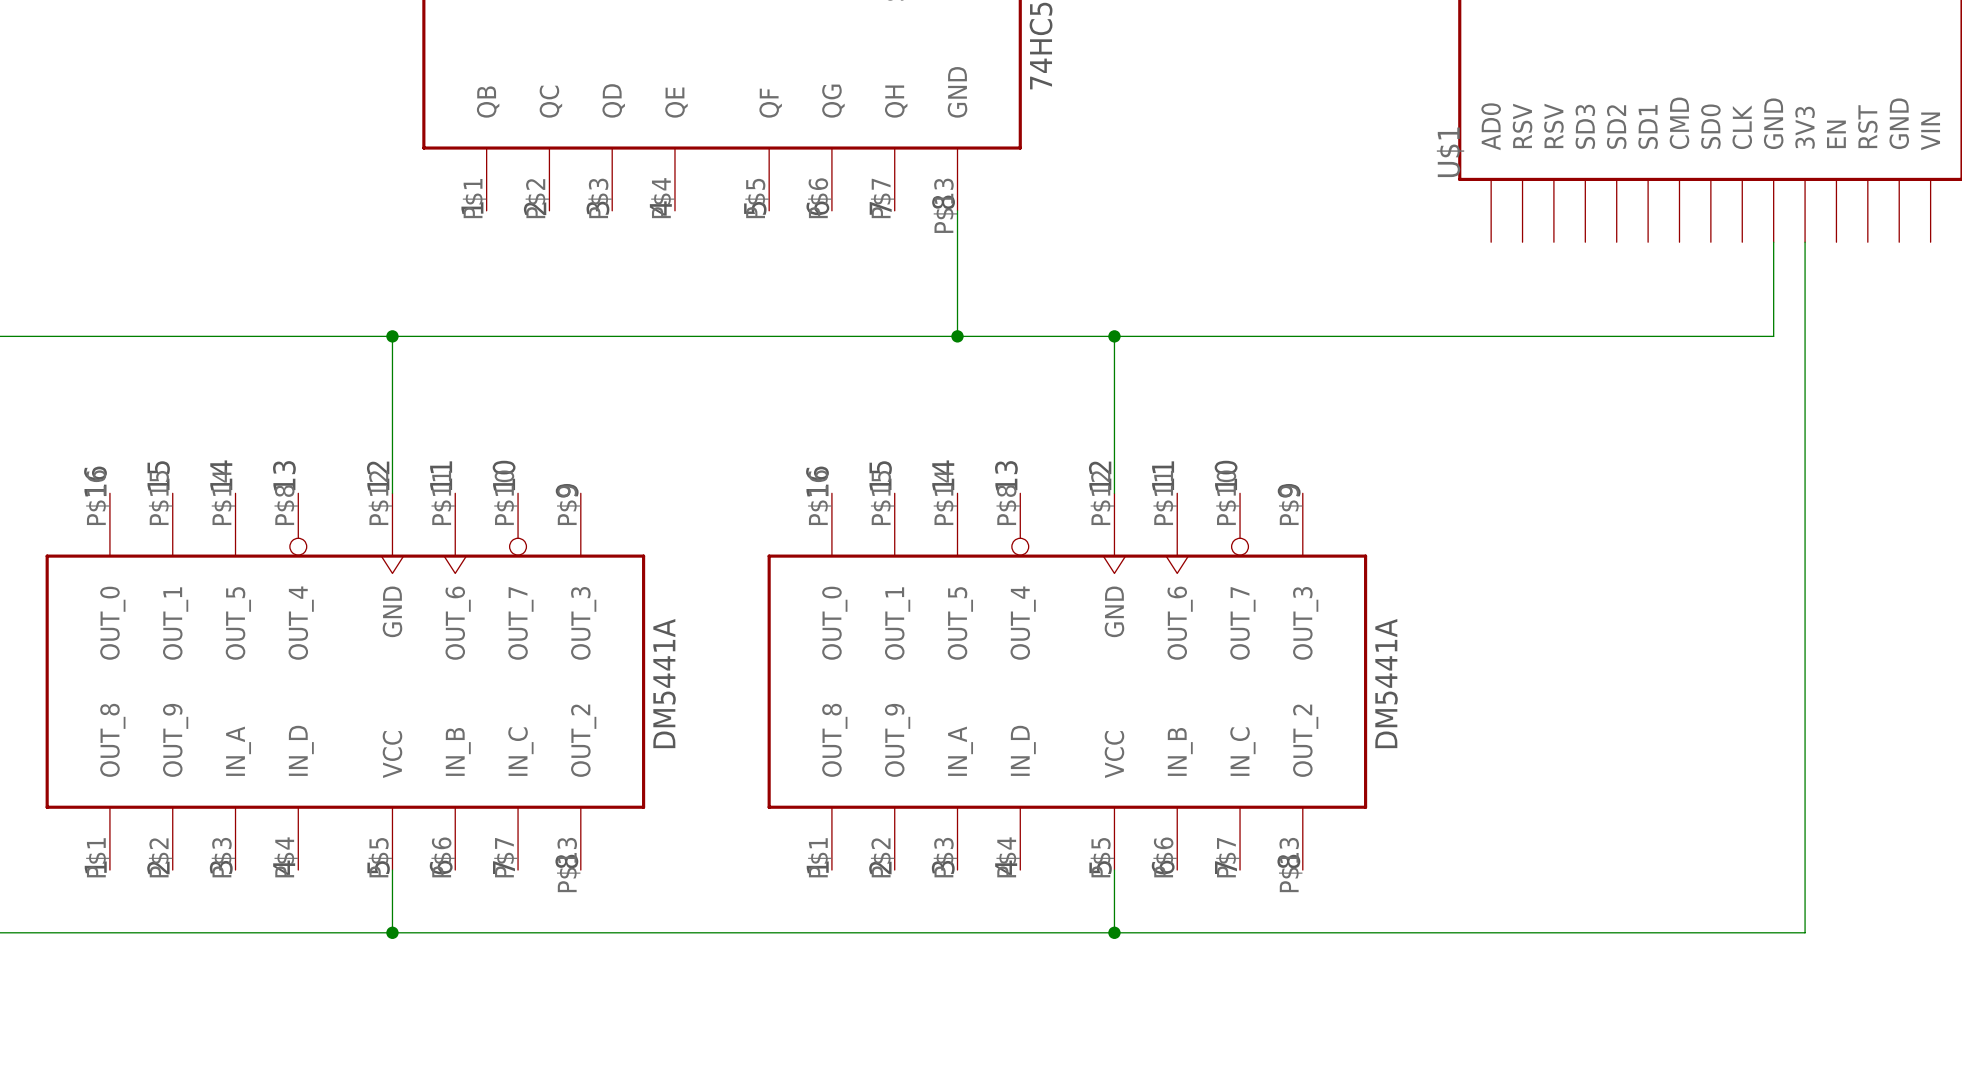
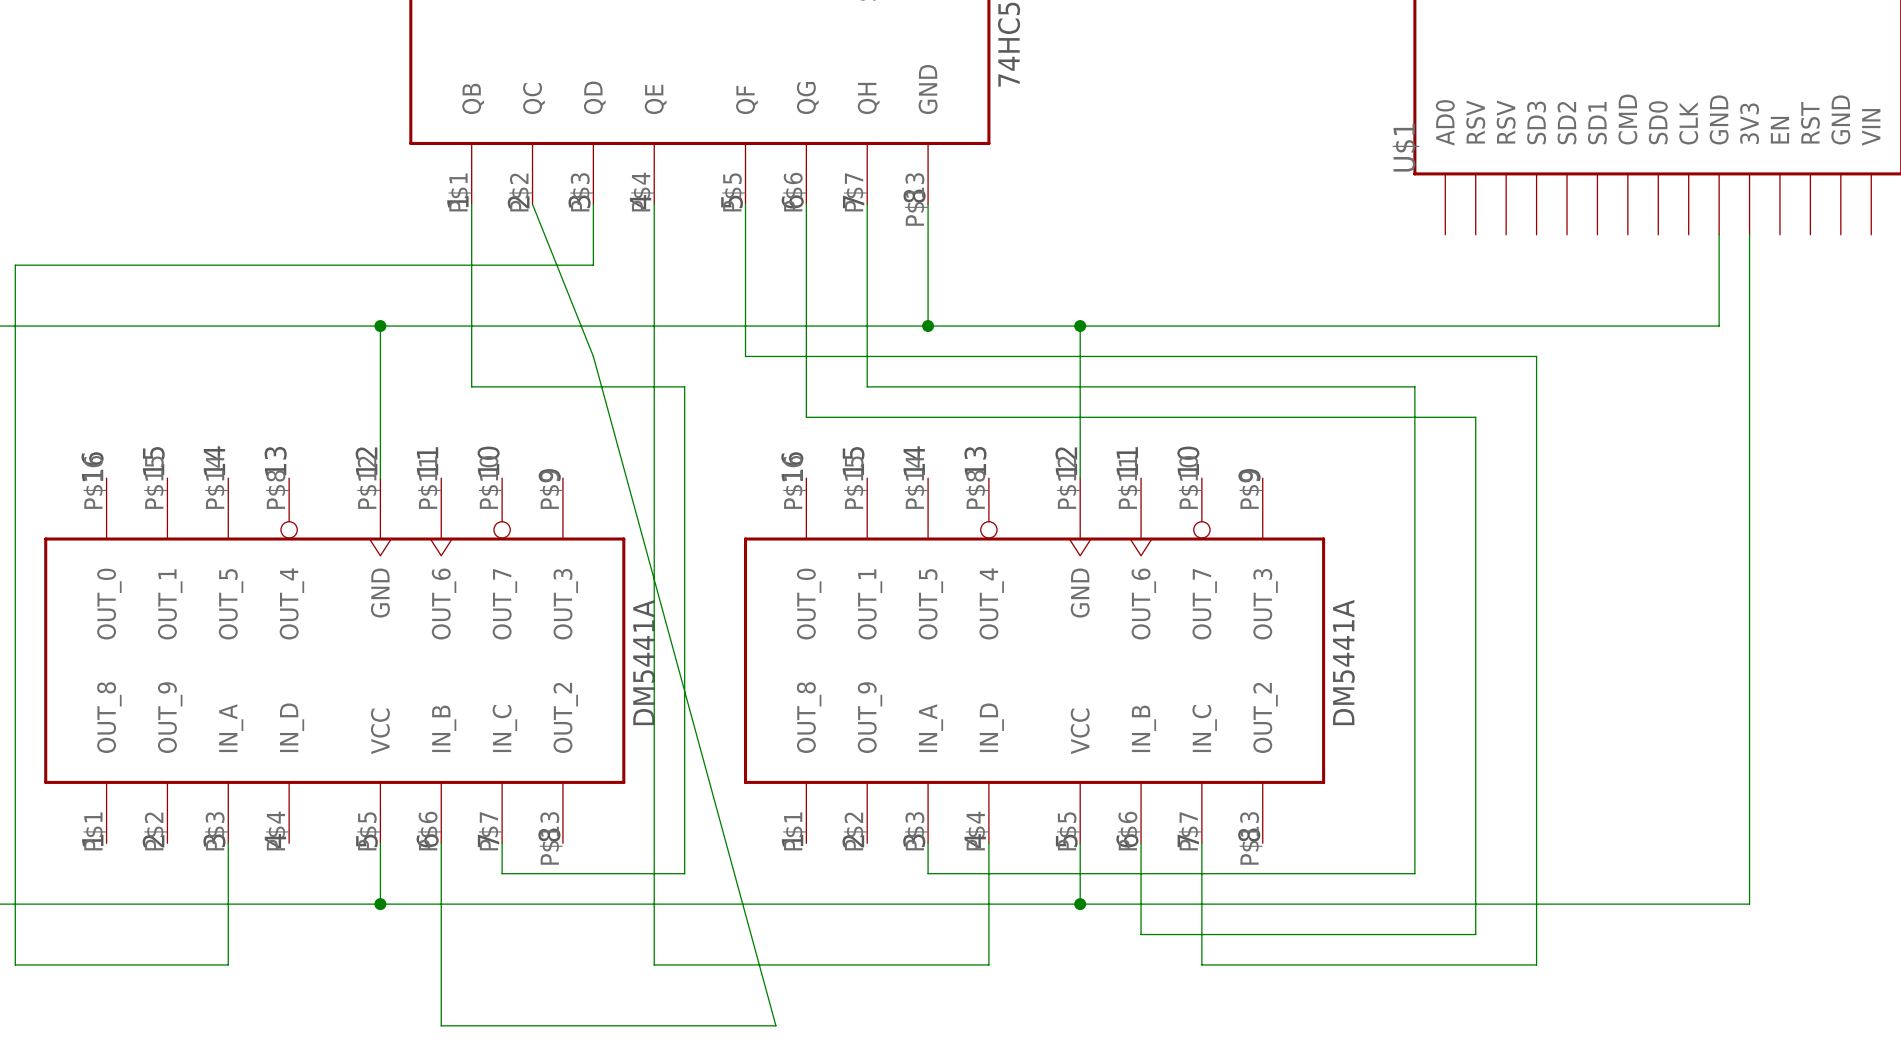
wire: none -> (471, 204) (471, 386) (684, 386) (684, 873) (502, 873) (502, 843)
wire: none -> (532, 204) (593, 356) (775, 1025) (441, 1025) (441, 843)
wire: none -> (593, 204) (593, 265) (15, 265) (15, 964) (228, 964) (228, 843)
wire: none -> (654, 204) (654, 964) (988, 964) (988, 843)
wire: none -> (745, 204) (745, 356) (1536, 356) (1536, 964) (1201, 964) (1201, 843)
wire: none -> (806, 204) (806, 417) (1475, 417) (1475, 934) (1141, 934) (1141, 843)
wire: none -> (867, 204) (867, 386) (1414, 386) (1414, 873) (928, 873) (928, 843)

